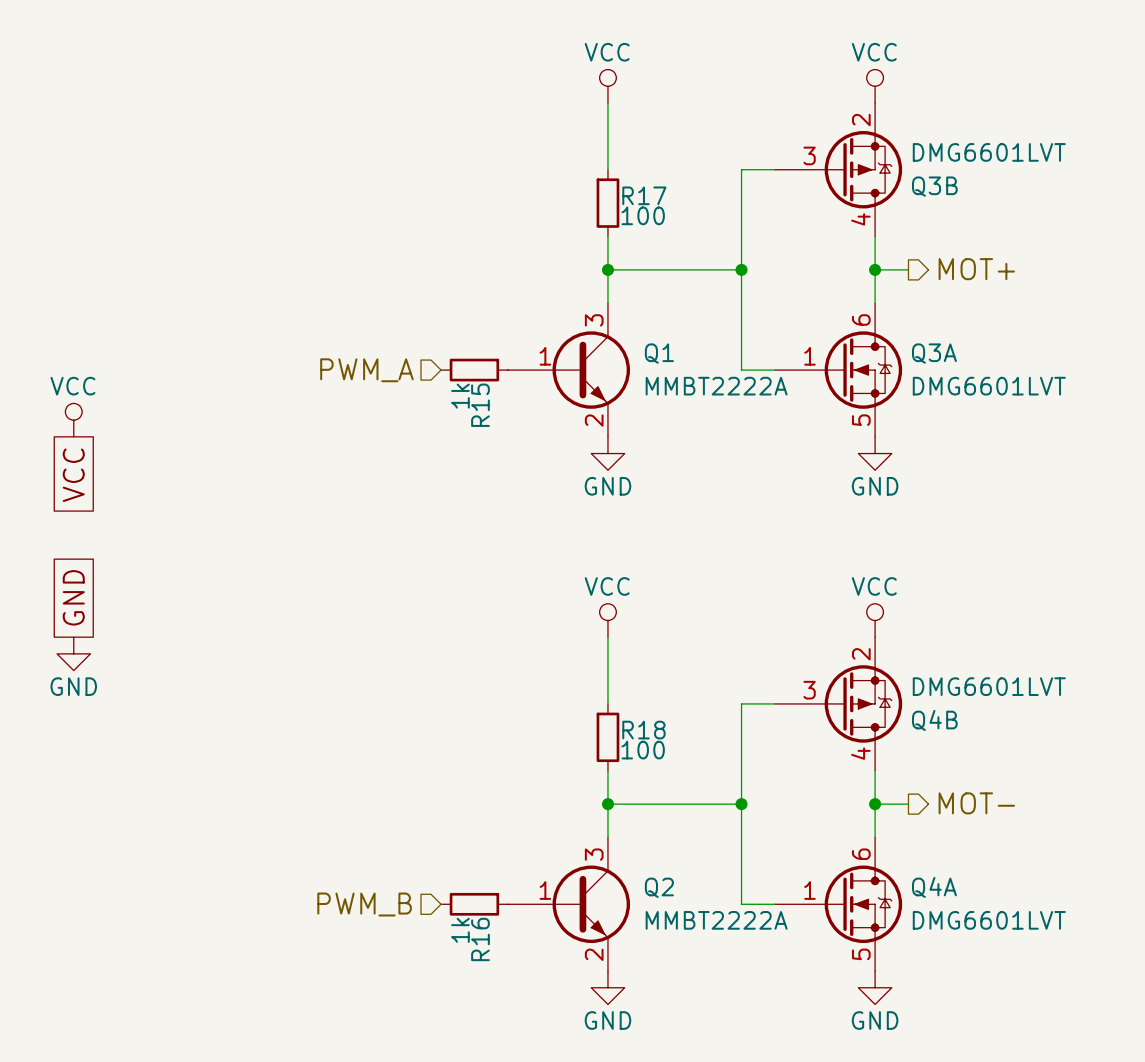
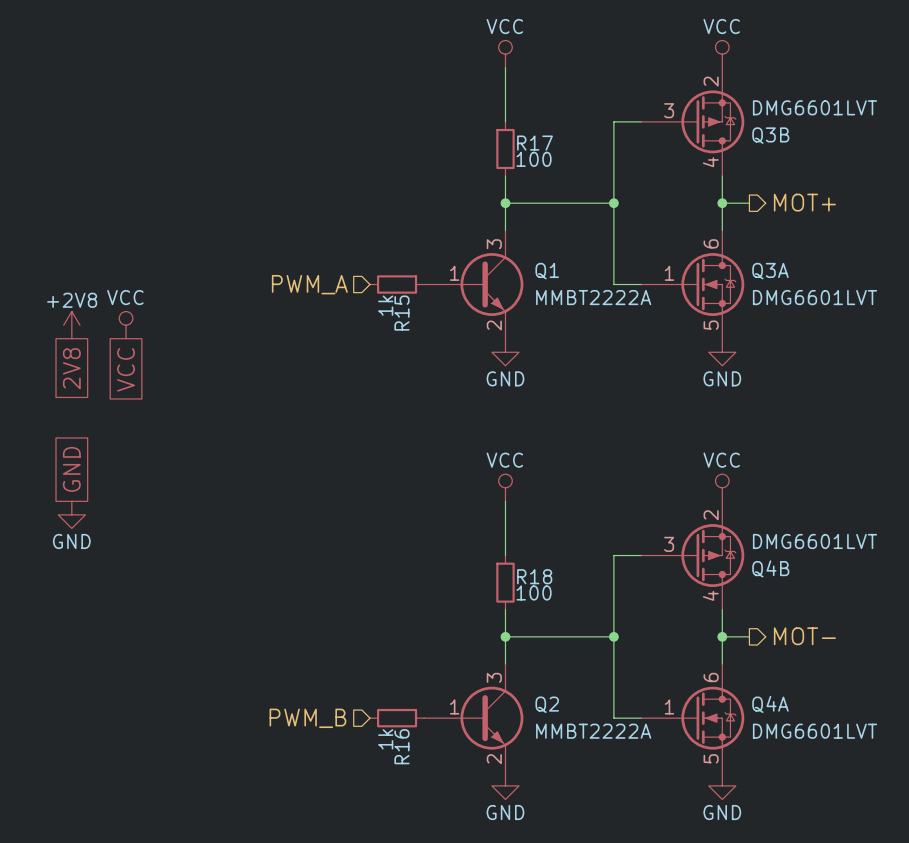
power symbol: VCC (73, 420) -> +2V8 (71, 325)
power symbol: none -> VCC (126, 325)
global label: VCC (73, 475) -> 2V8 (71, 368)
global label: none -> VCC (126, 369)

